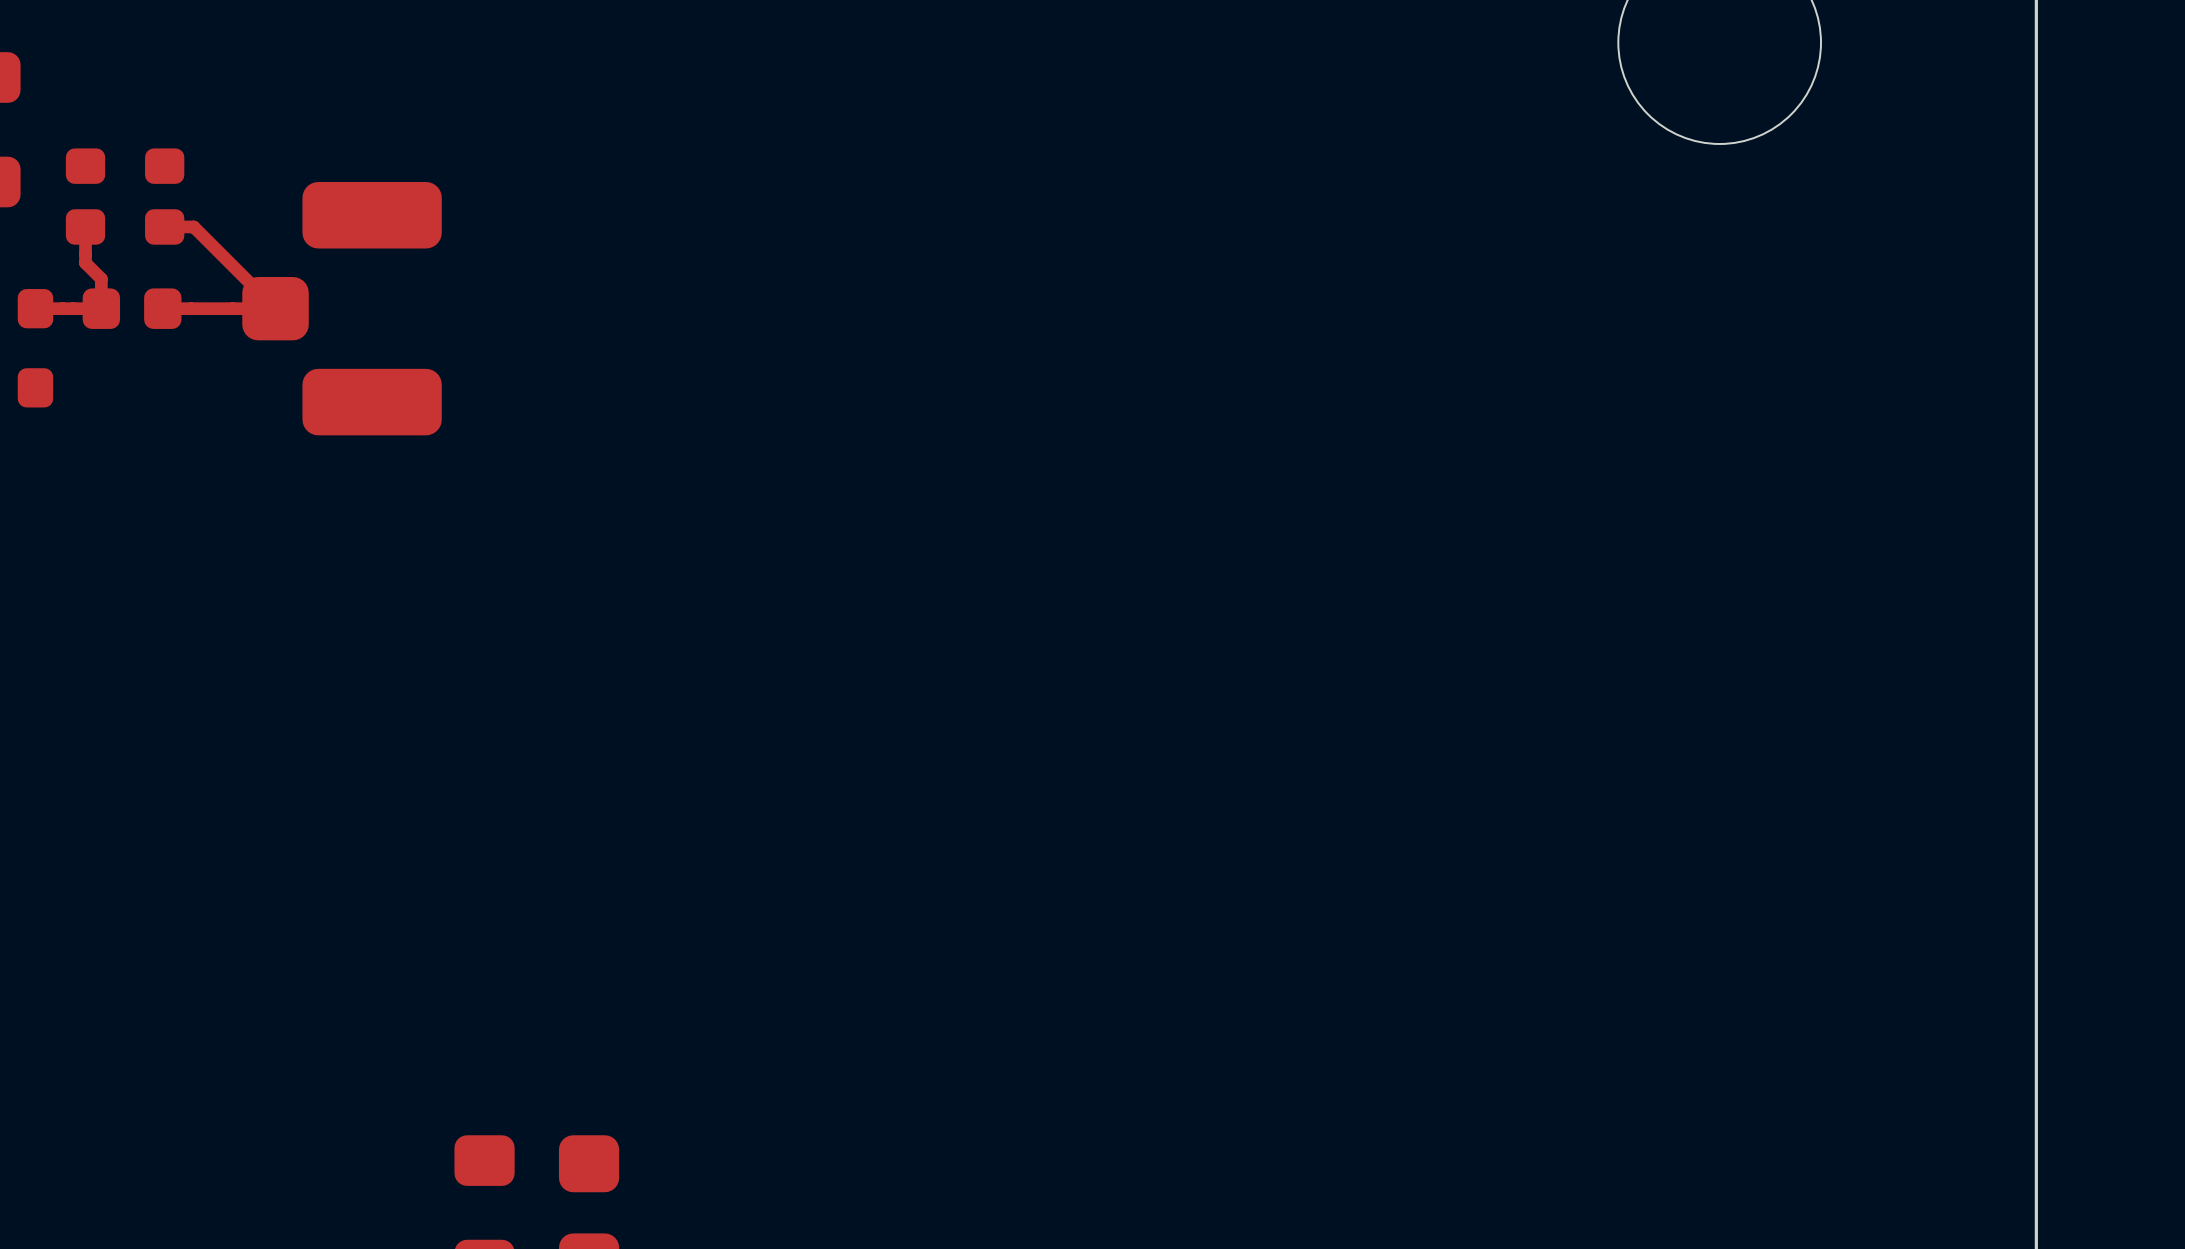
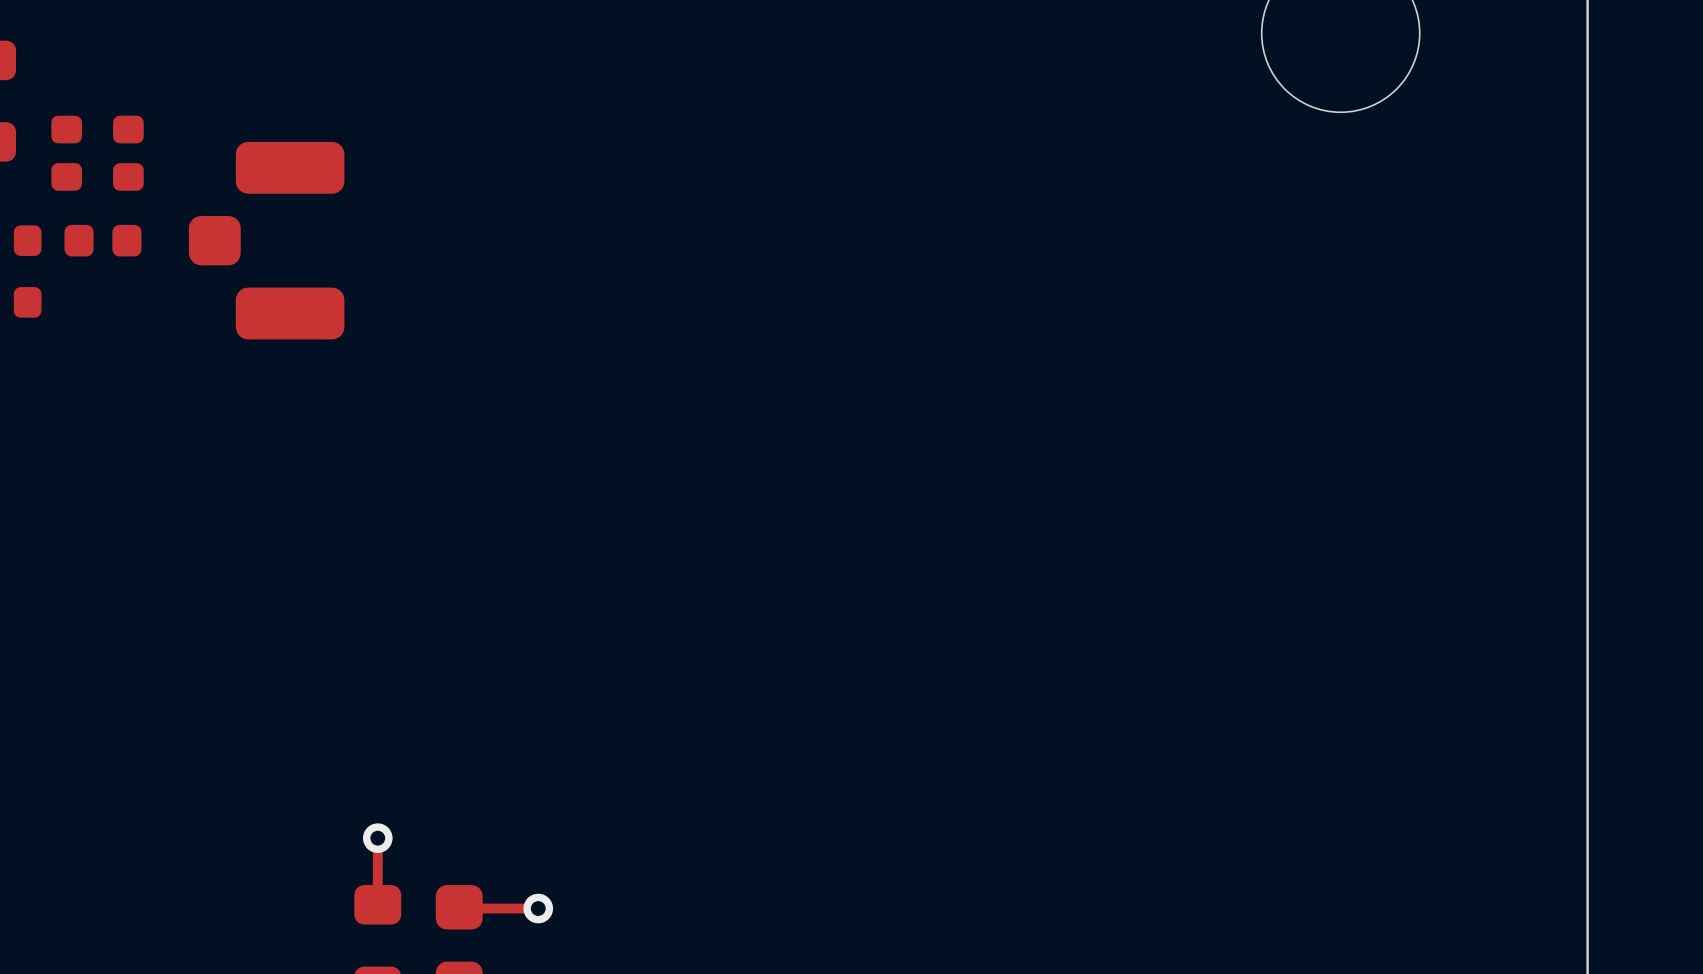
top track: (85, 226) (85, 263) (101, 278) (101, 308) (35, 308) -> none
top track: (164, 226) (193, 226) (275, 308) (162, 308) -> none
top track: none -> (377, 838) (377, 904) (380, 907)
via: none -> (377, 838)
top track: none -> (459, 906) (461, 908) (538, 908)
via: none -> (538, 908)

